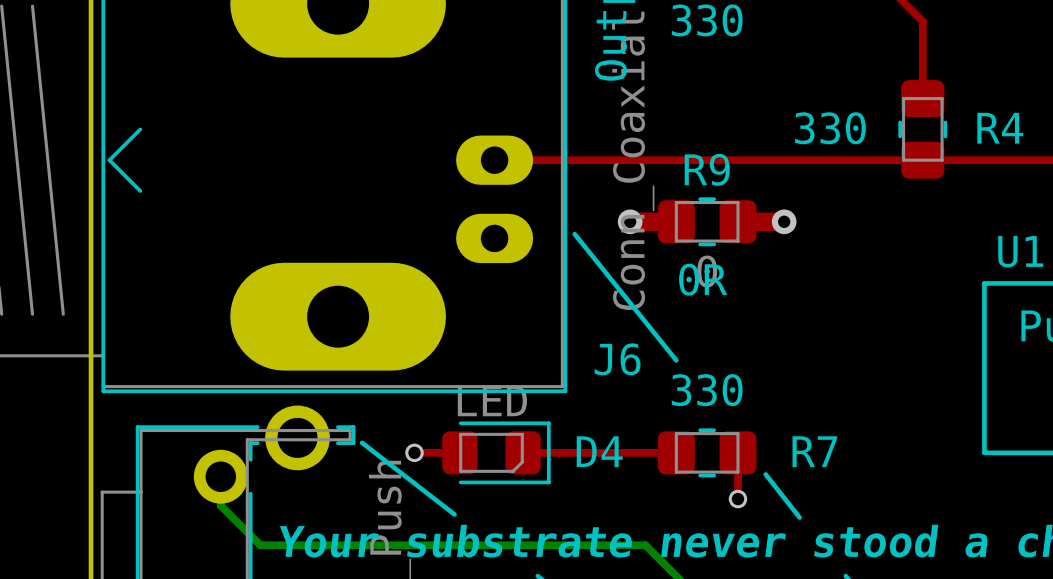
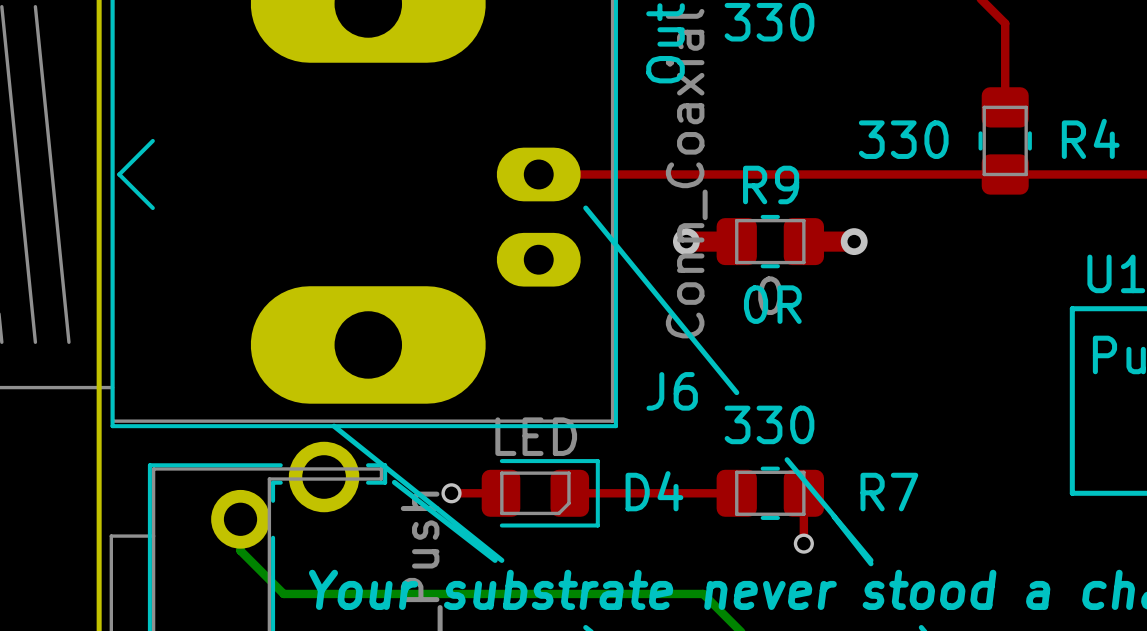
line: (574, 234) (676, 360) -> (585, 208) (736, 392)
line: none -> (334, 426) (501, 560)
line: none -> (787, 459) (870, 560)

